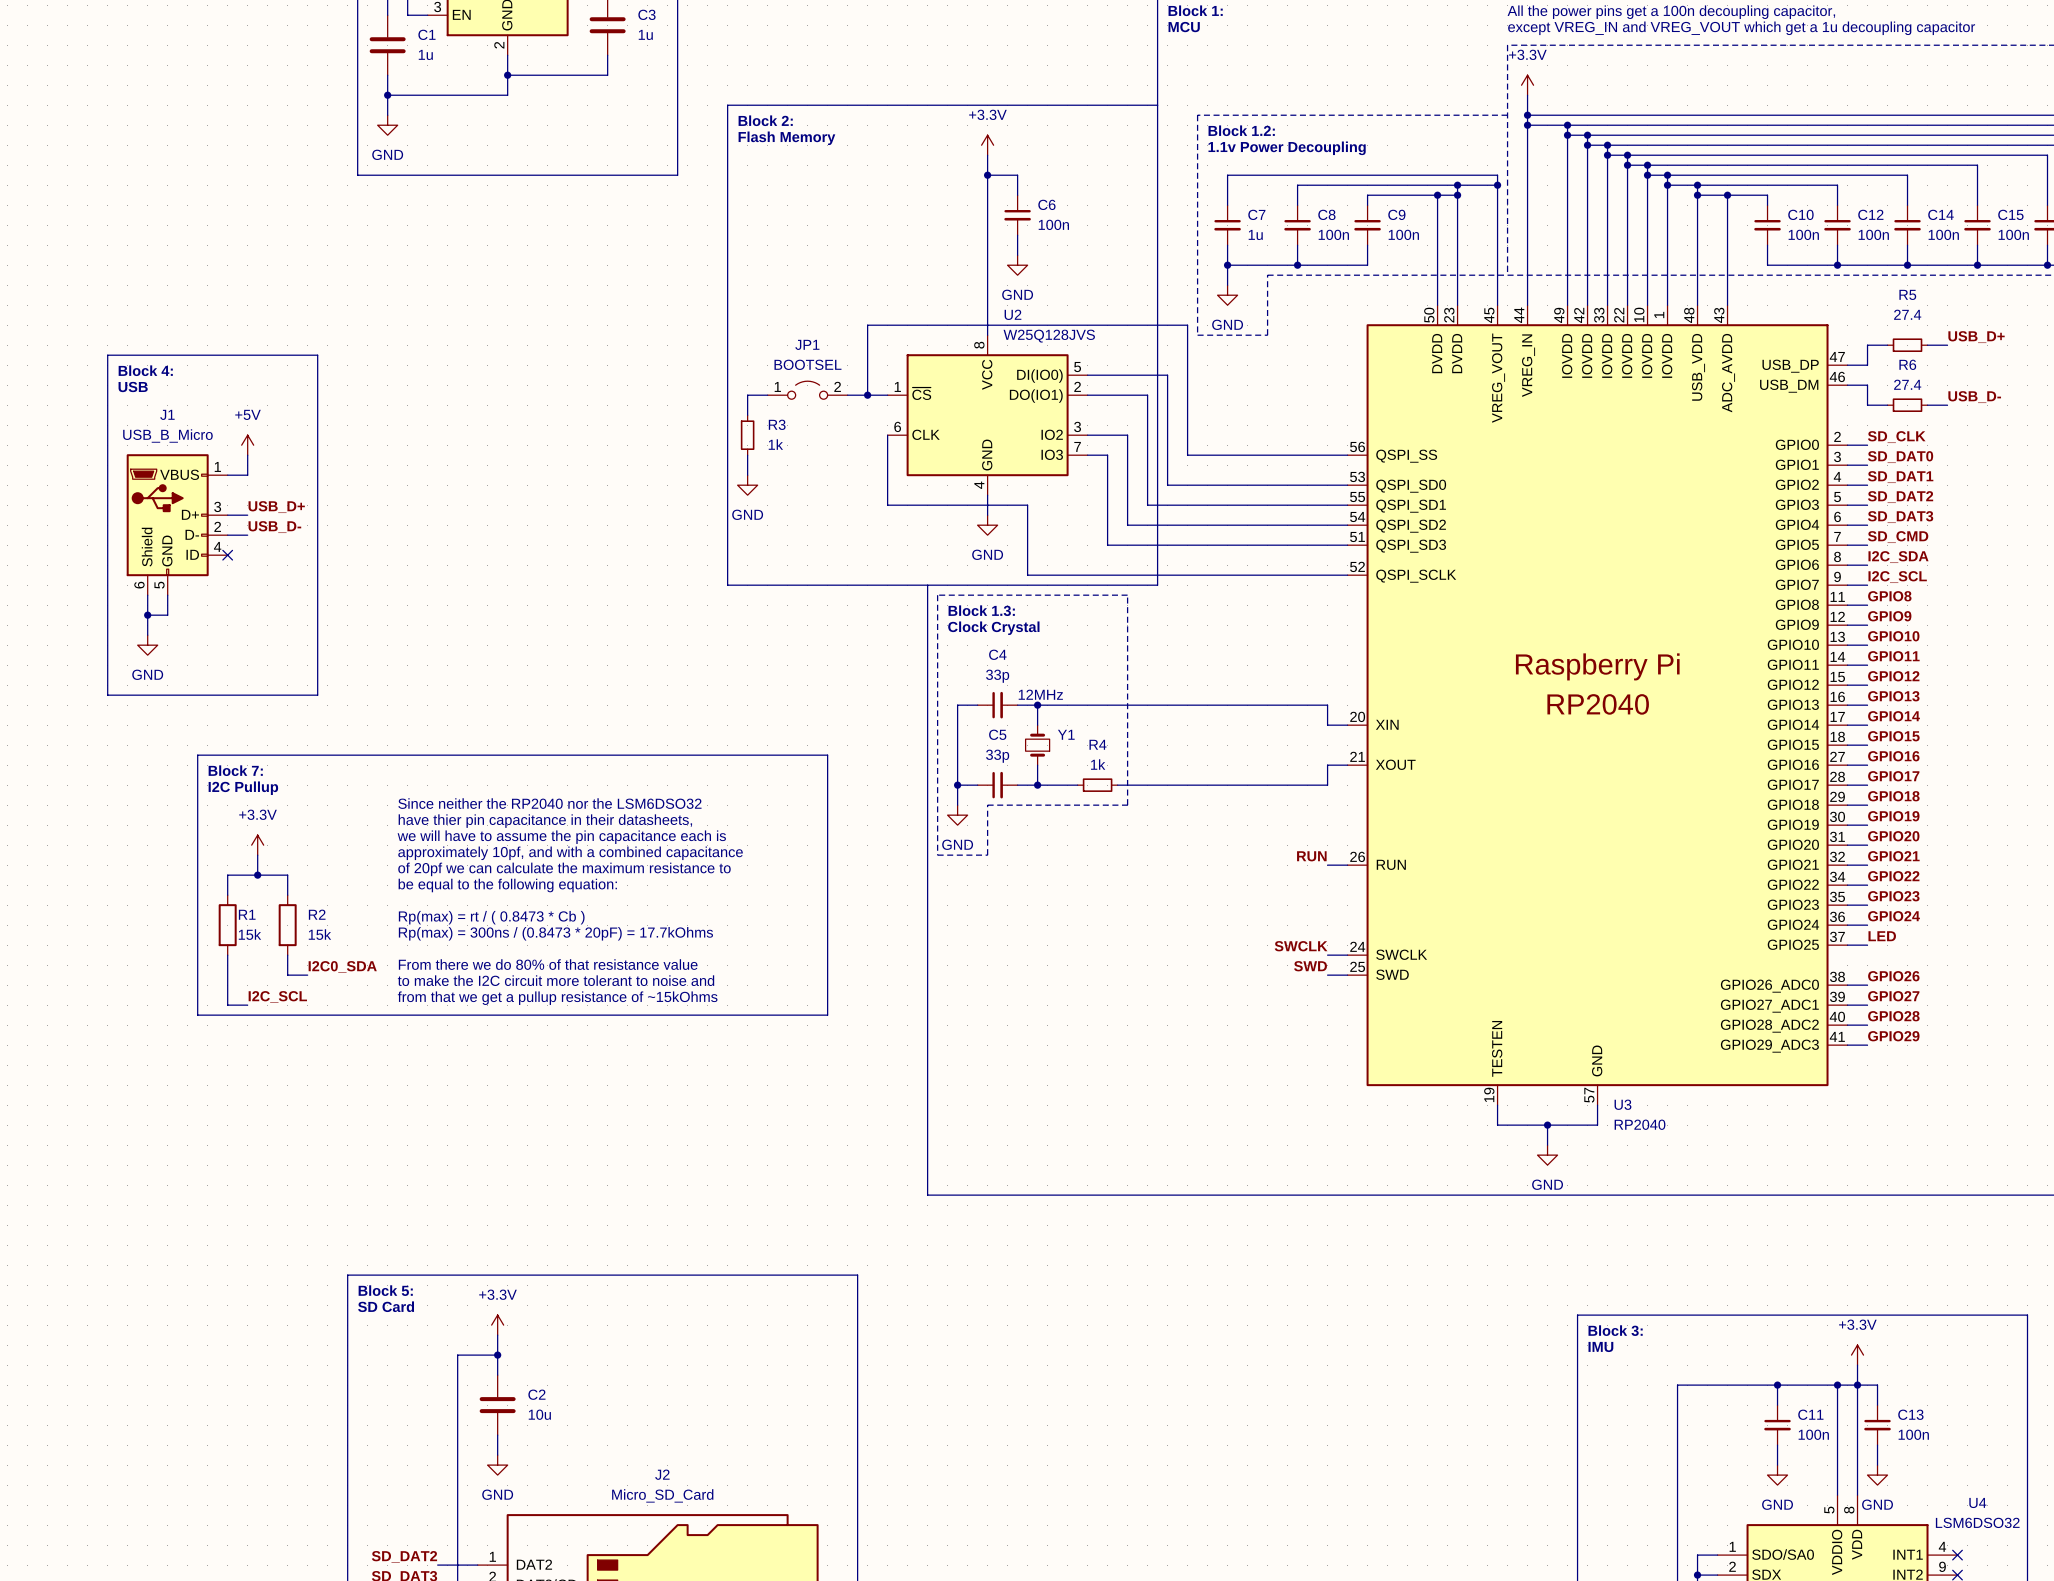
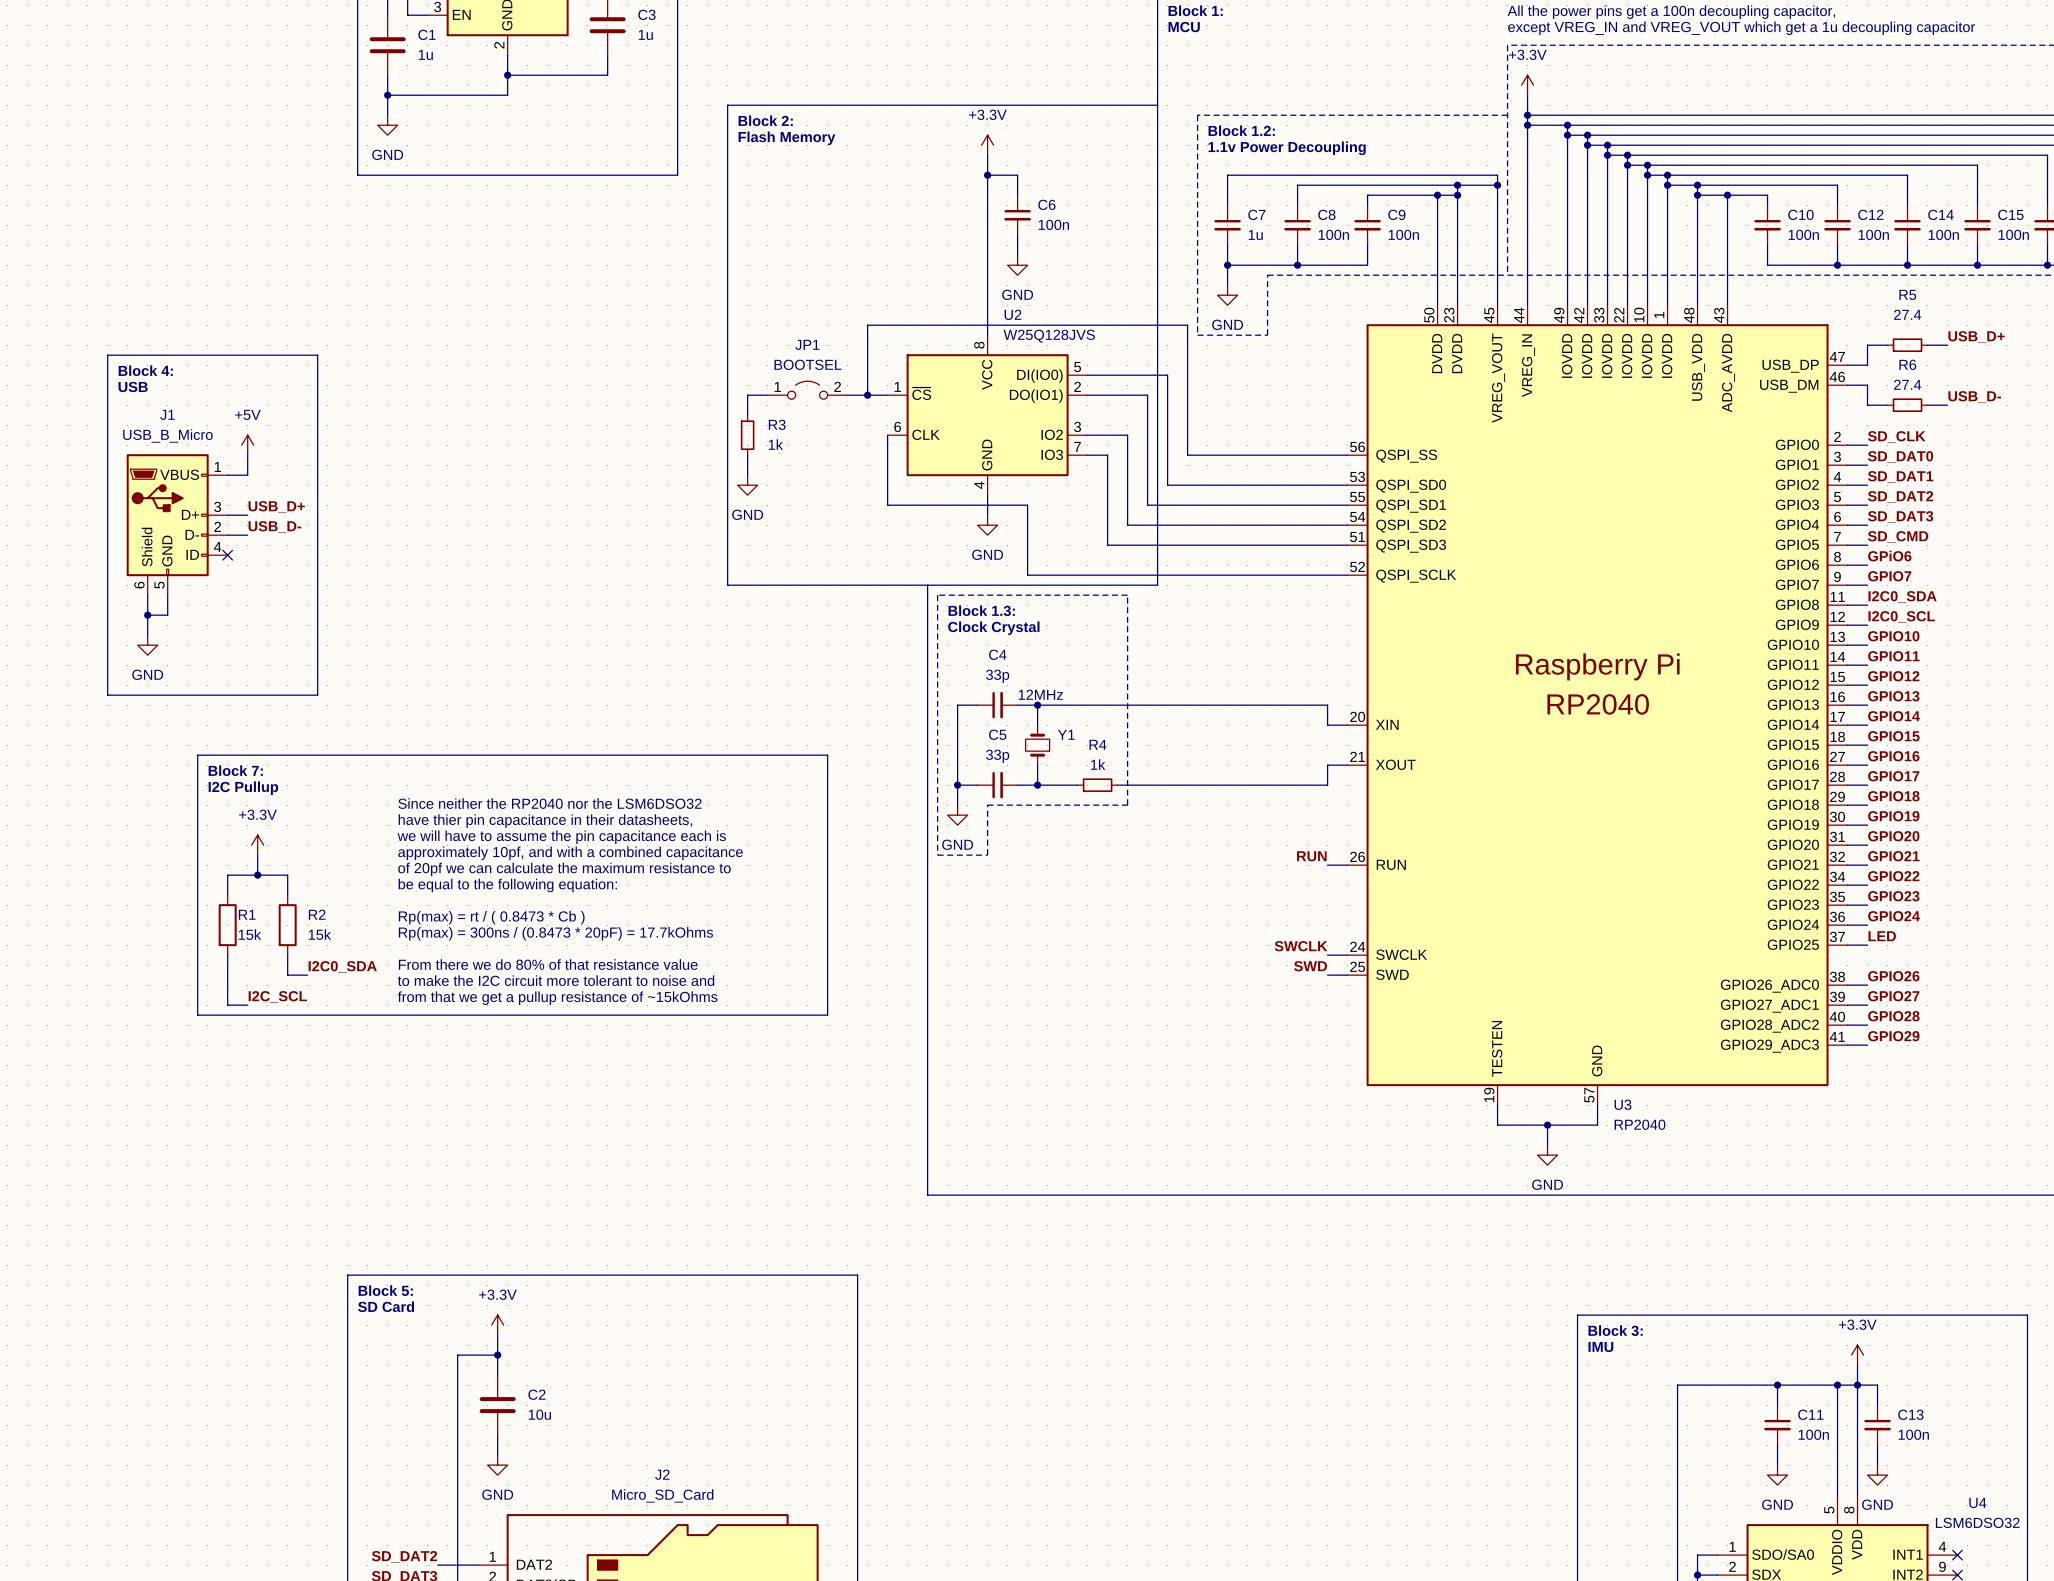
label: I2C_SDA (1898, 557) -> GPiO6 (1889, 556)
label: I2C_SCL (1897, 577) -> GPIO7 (1889, 576)
label: GPIO8 (1889, 596) -> I2C0_SDA (1902, 597)
label: GPIO9 (1889, 616) -> I2C0_SCL (1901, 617)

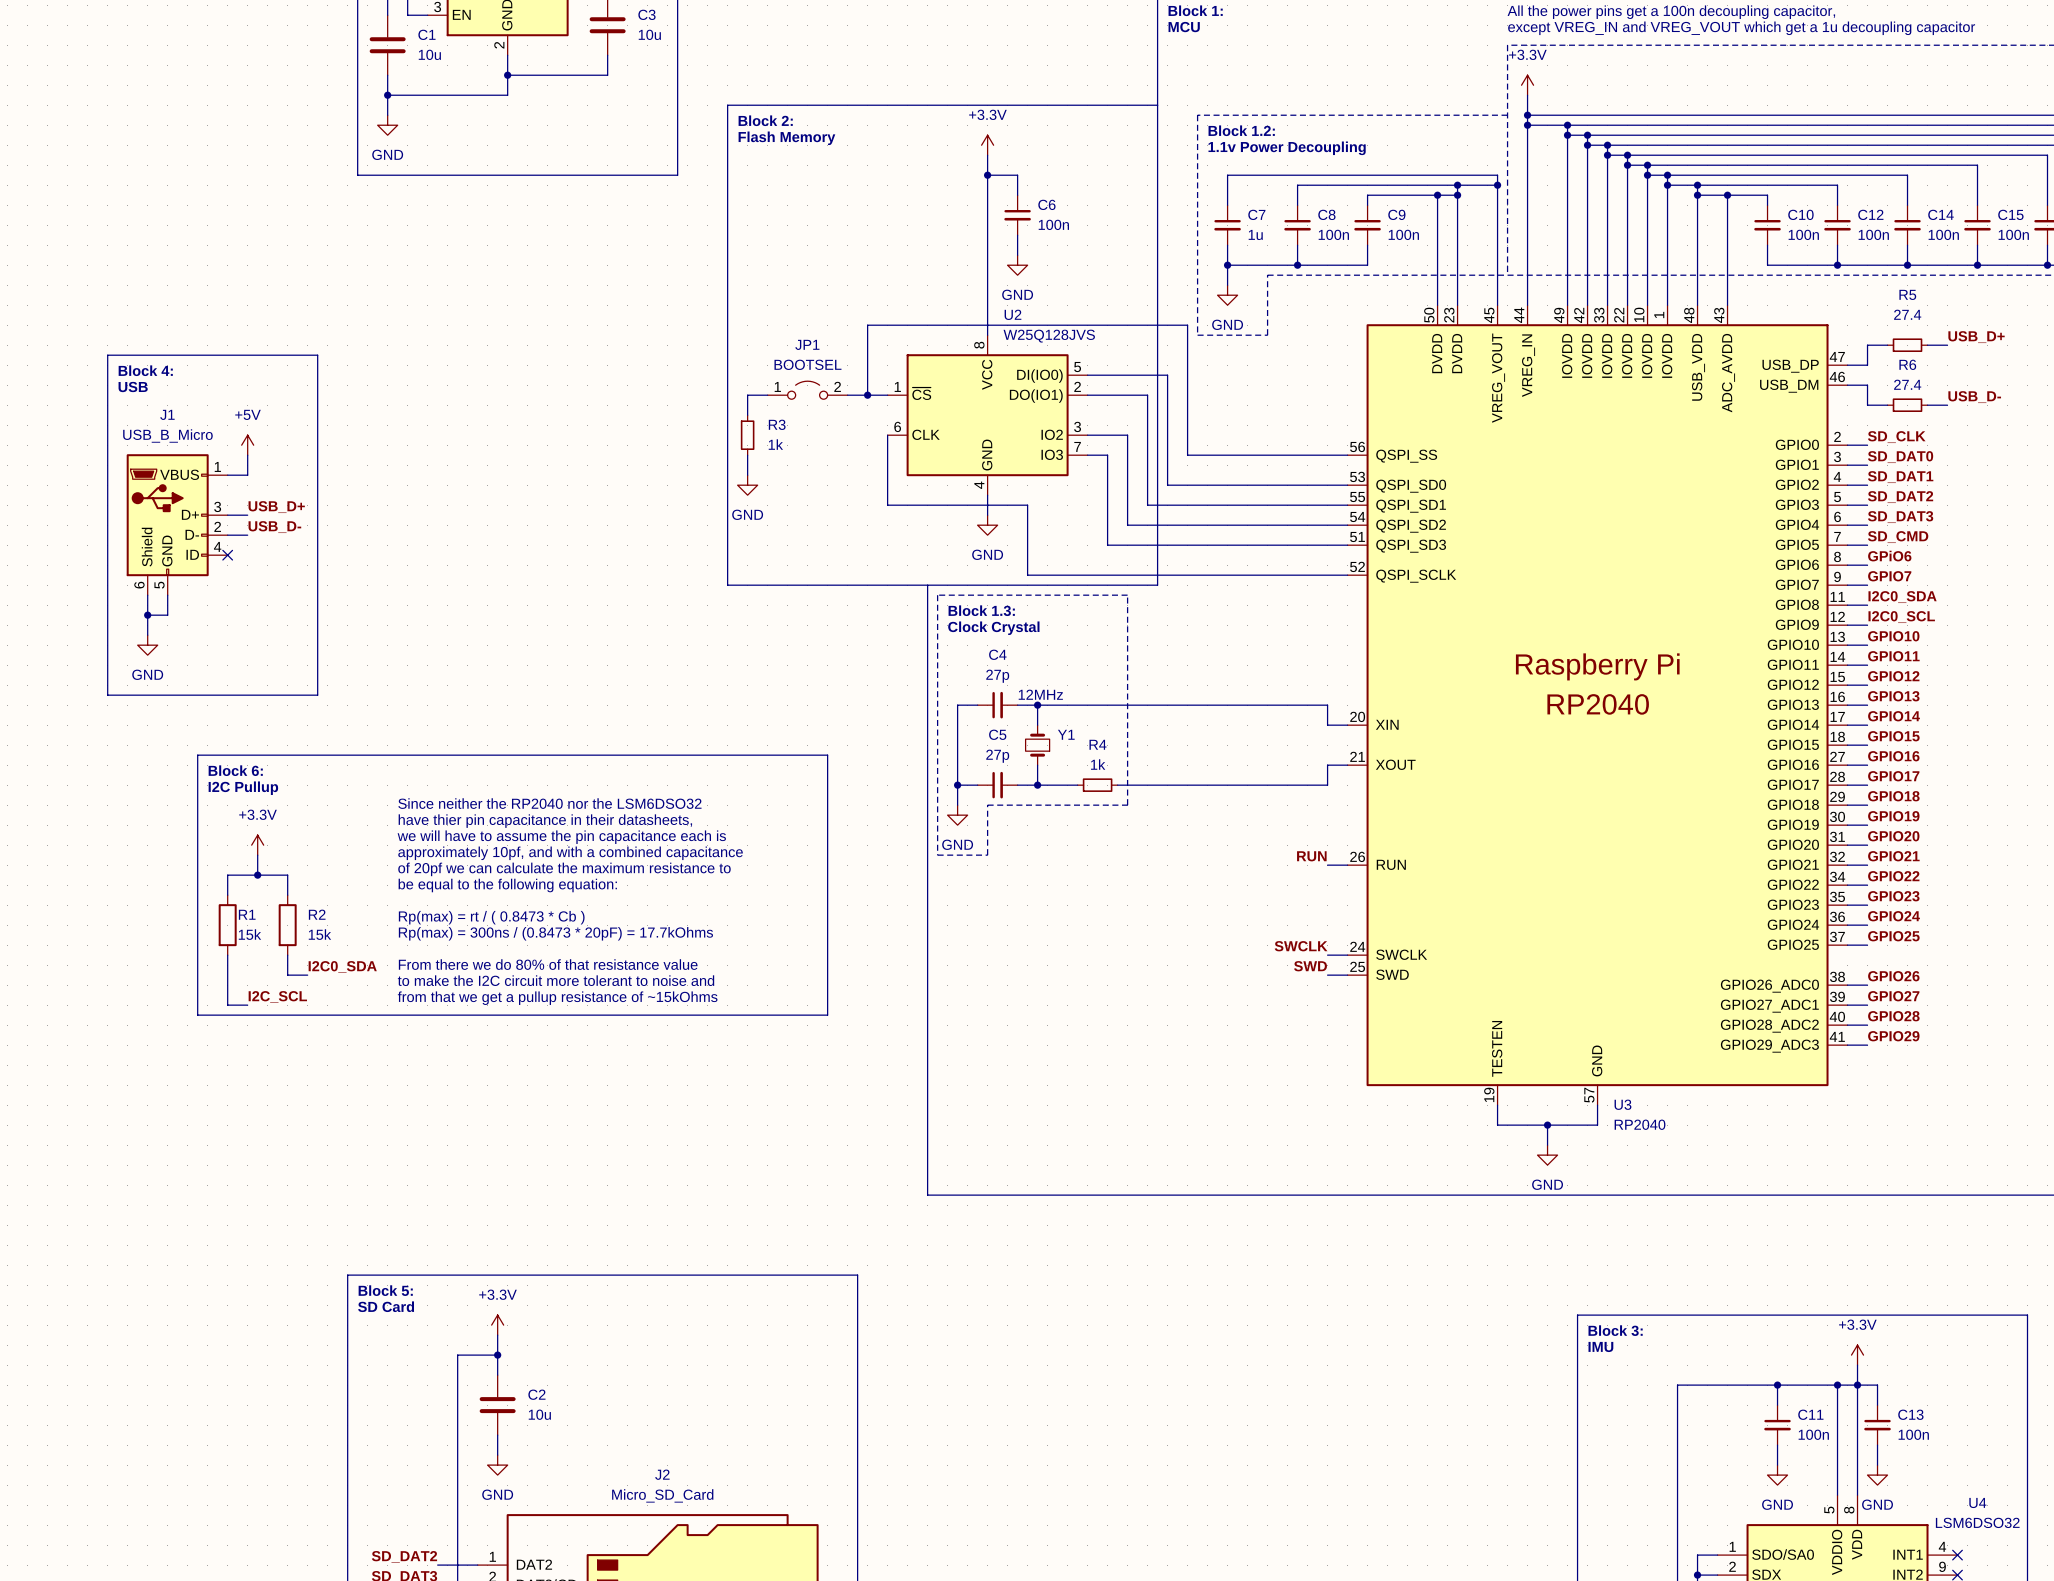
C3 value: 1u (645, 34) -> 10u (649, 34)
C1 value: 1u (425, 54) -> 10u (429, 54)
C4 value: 33p (997, 676) -> 27p (997, 676)
C5 value: 33p (997, 756) -> 27p (997, 756)
text: Block 7: (235, 770) -> Block 6: (235, 770)
label: LED (1882, 936) -> GPIO25 (1893, 936)

